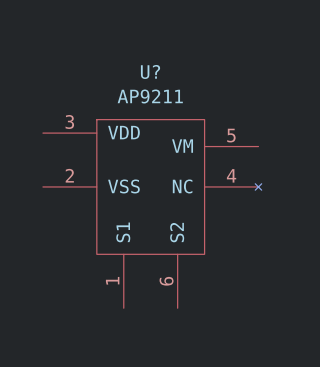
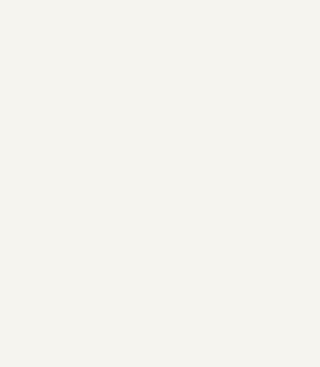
U?: AP9211 (152, 213) -> none

